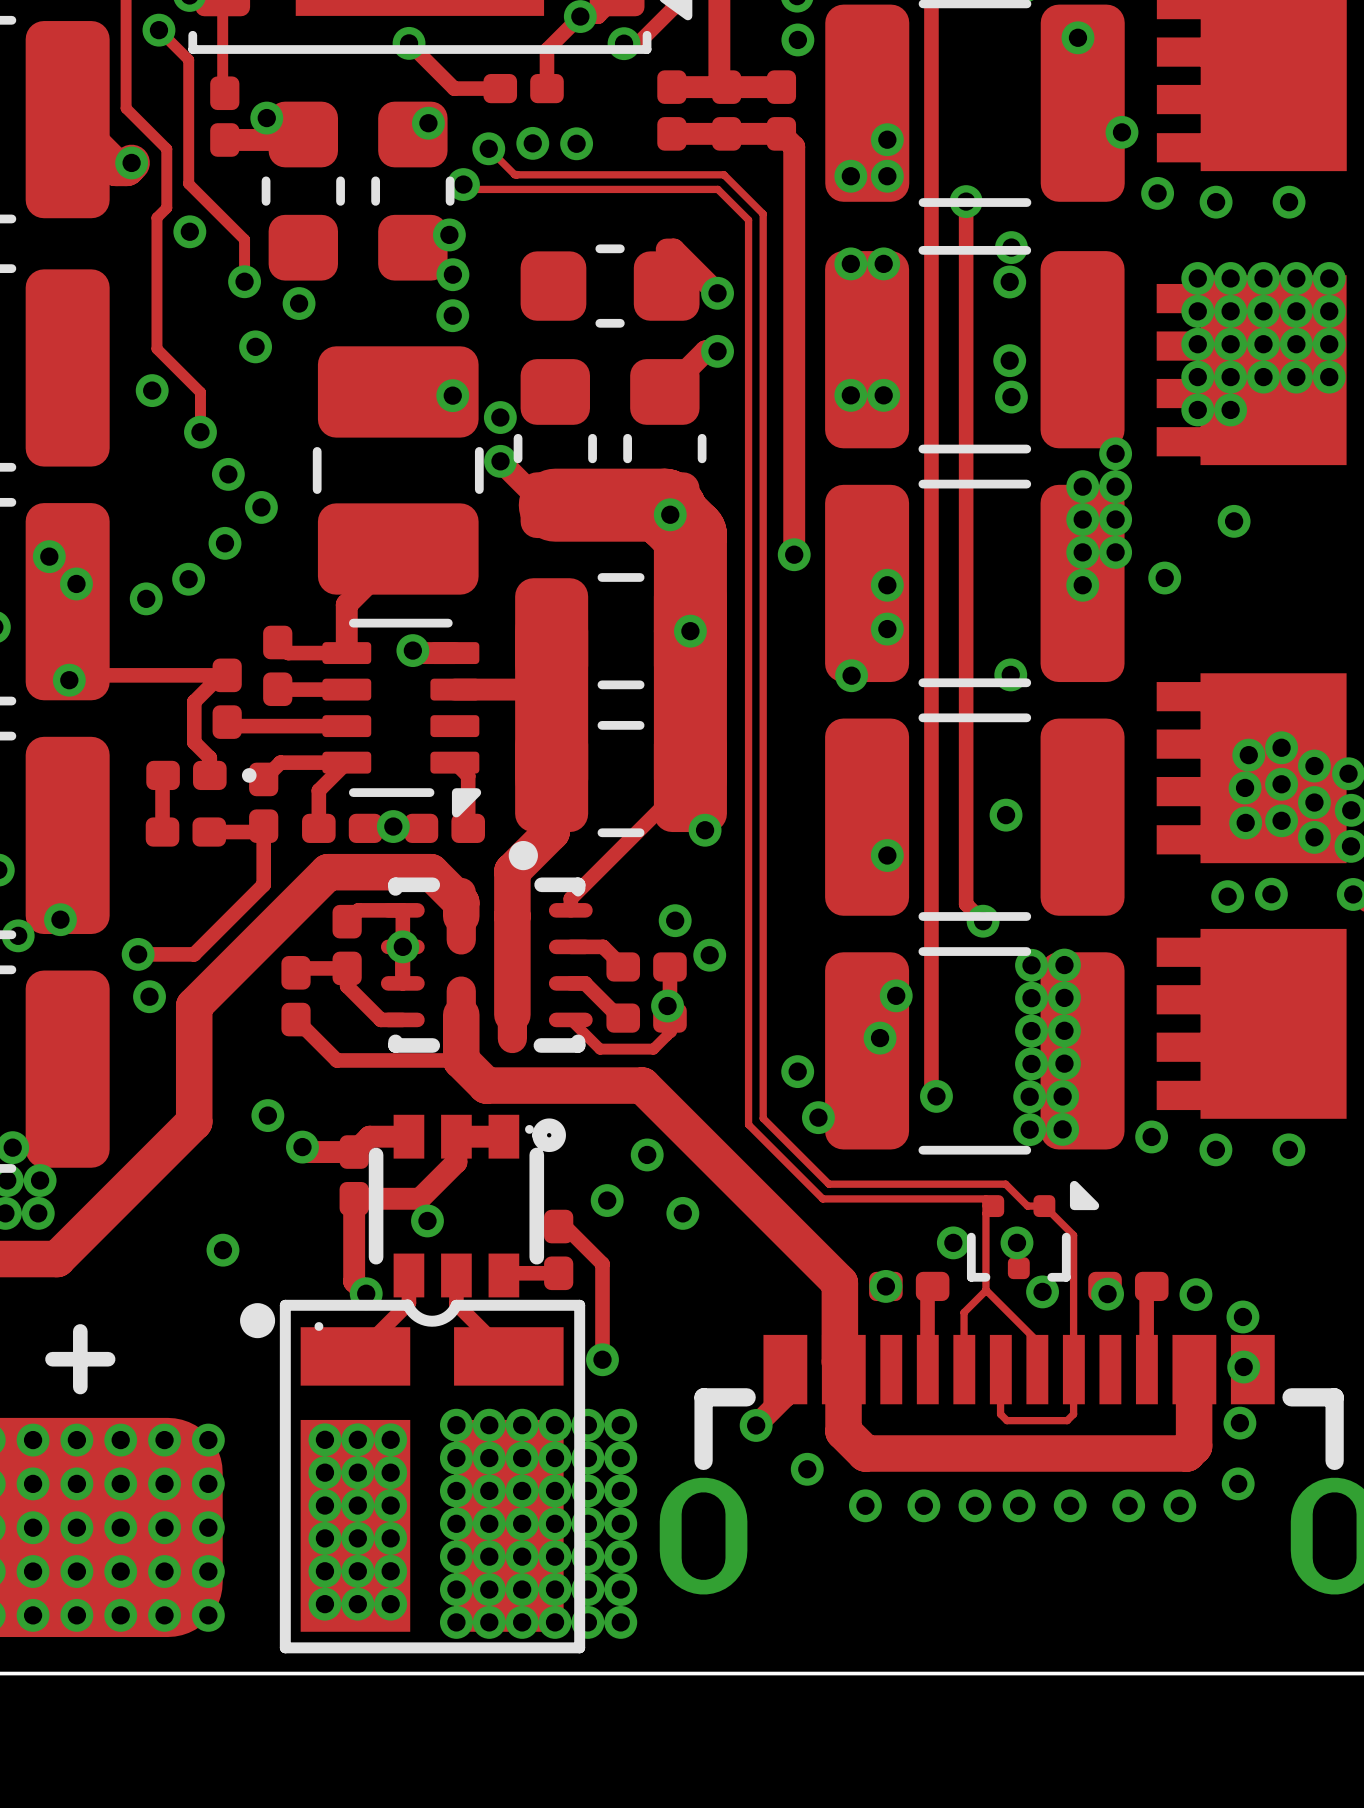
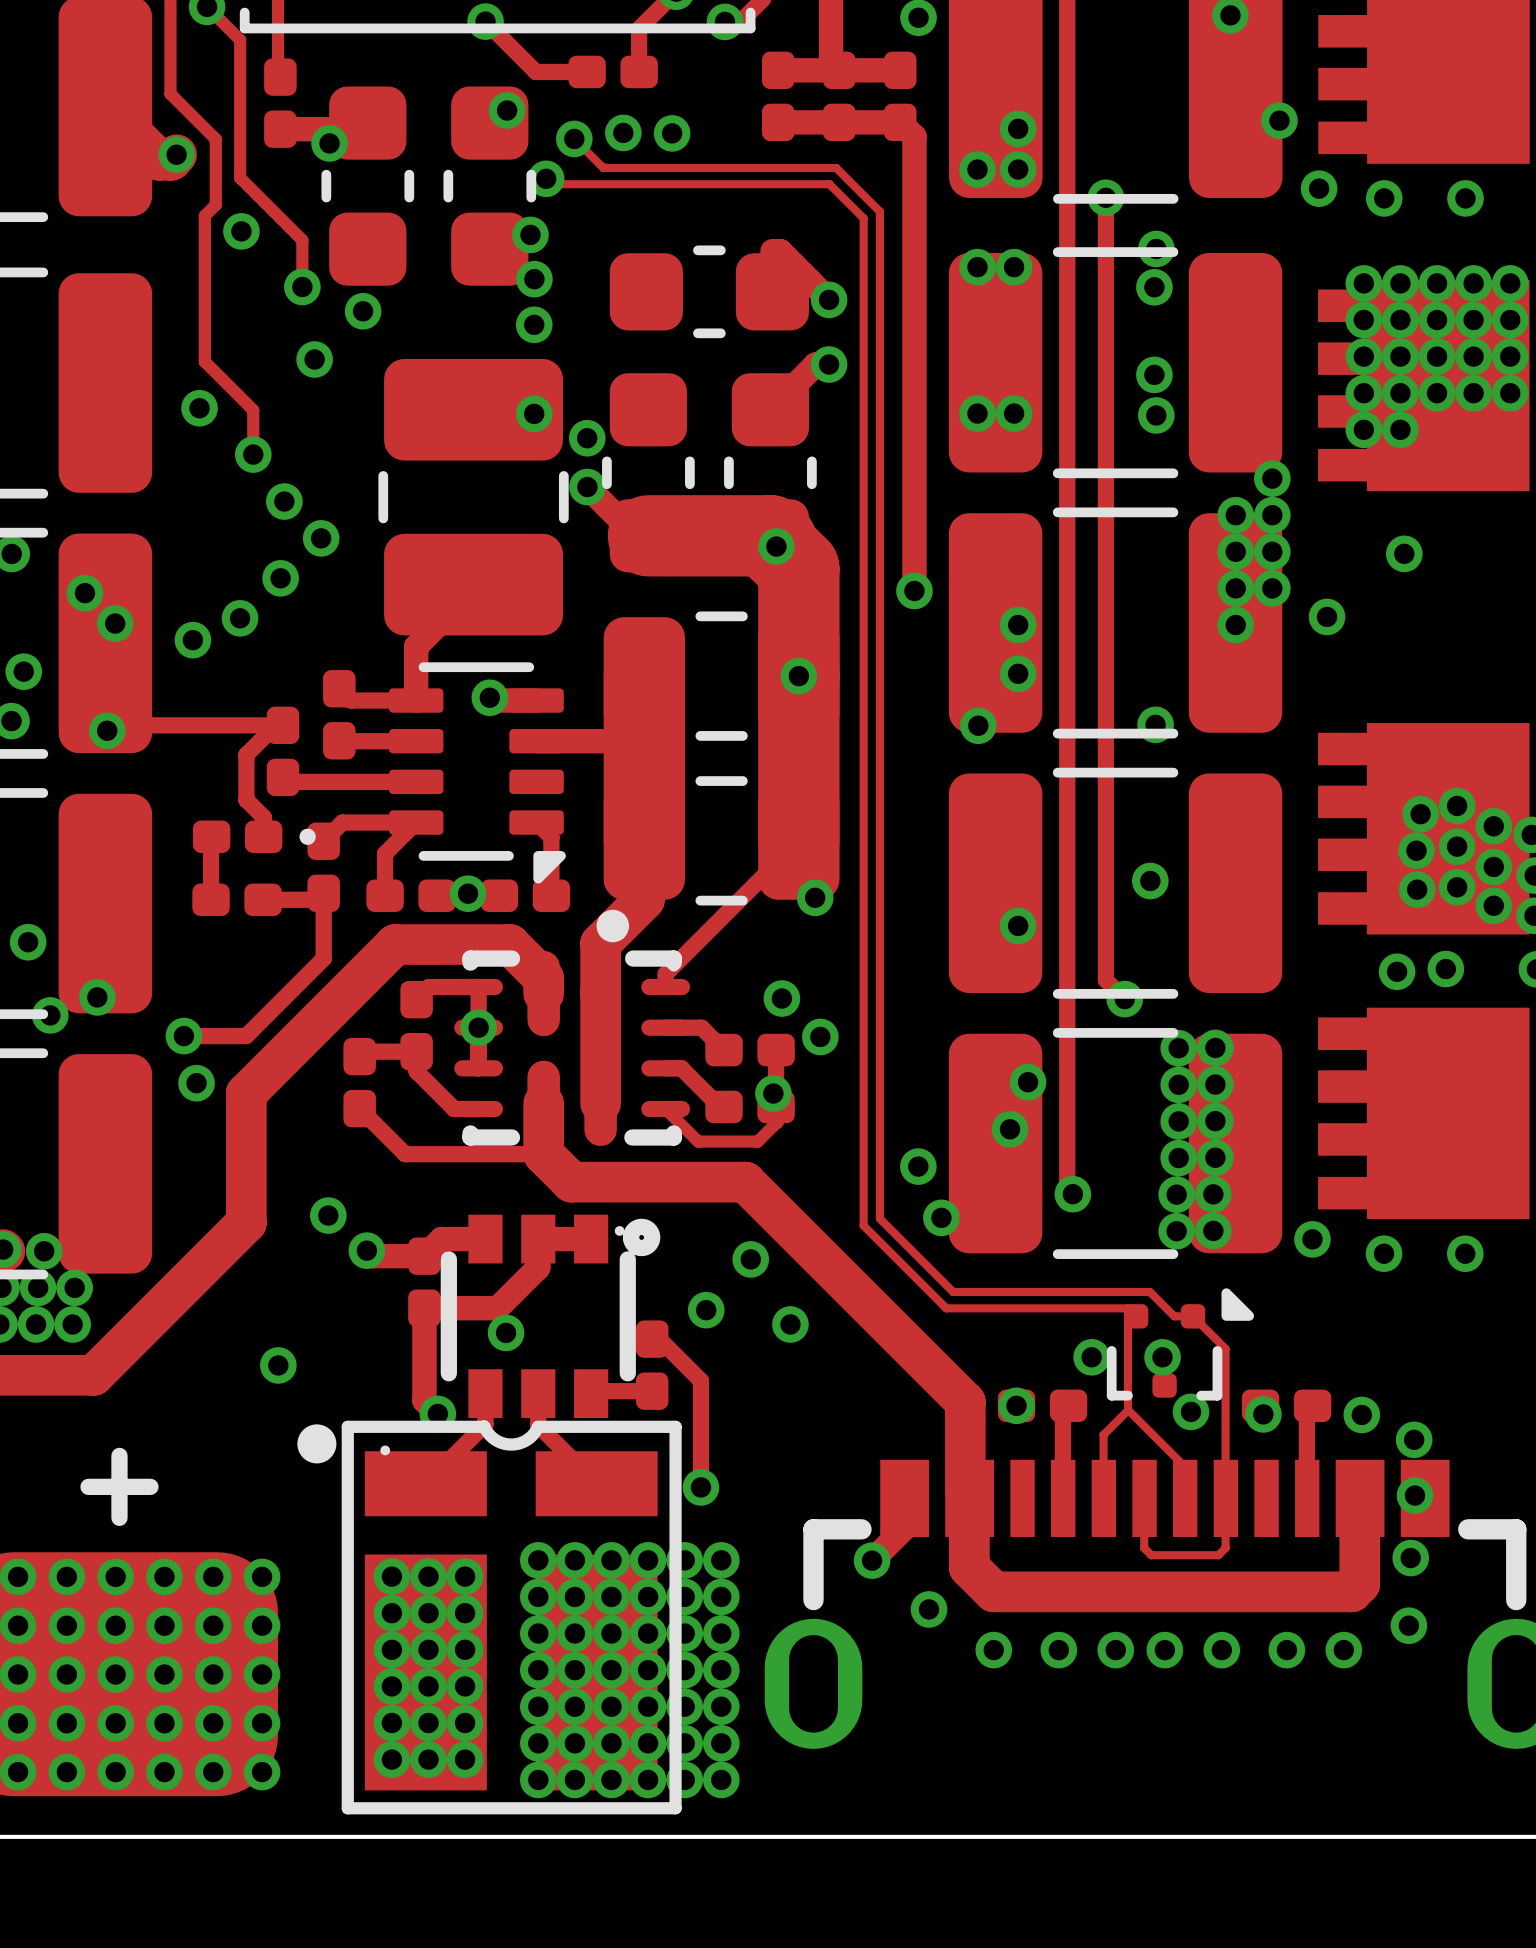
via position: (266, 118) -> (329, 143)

